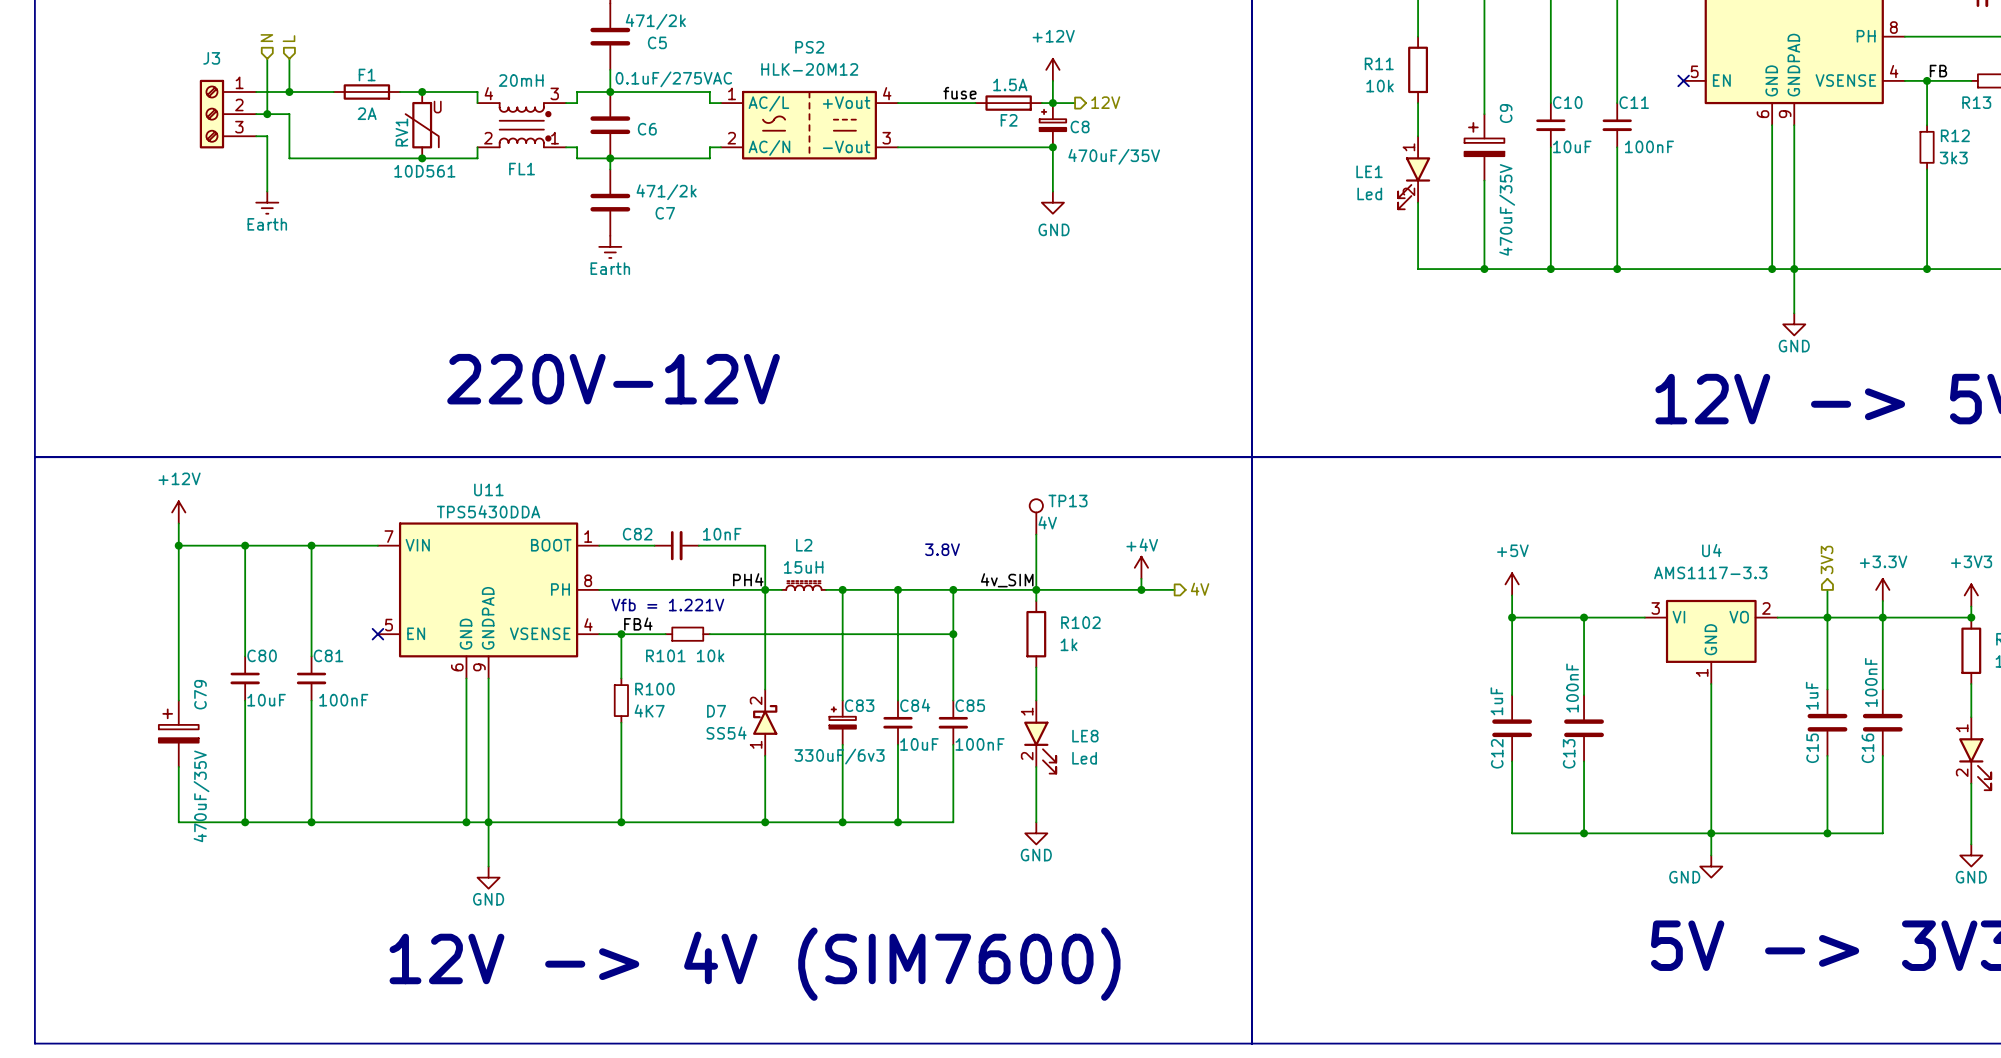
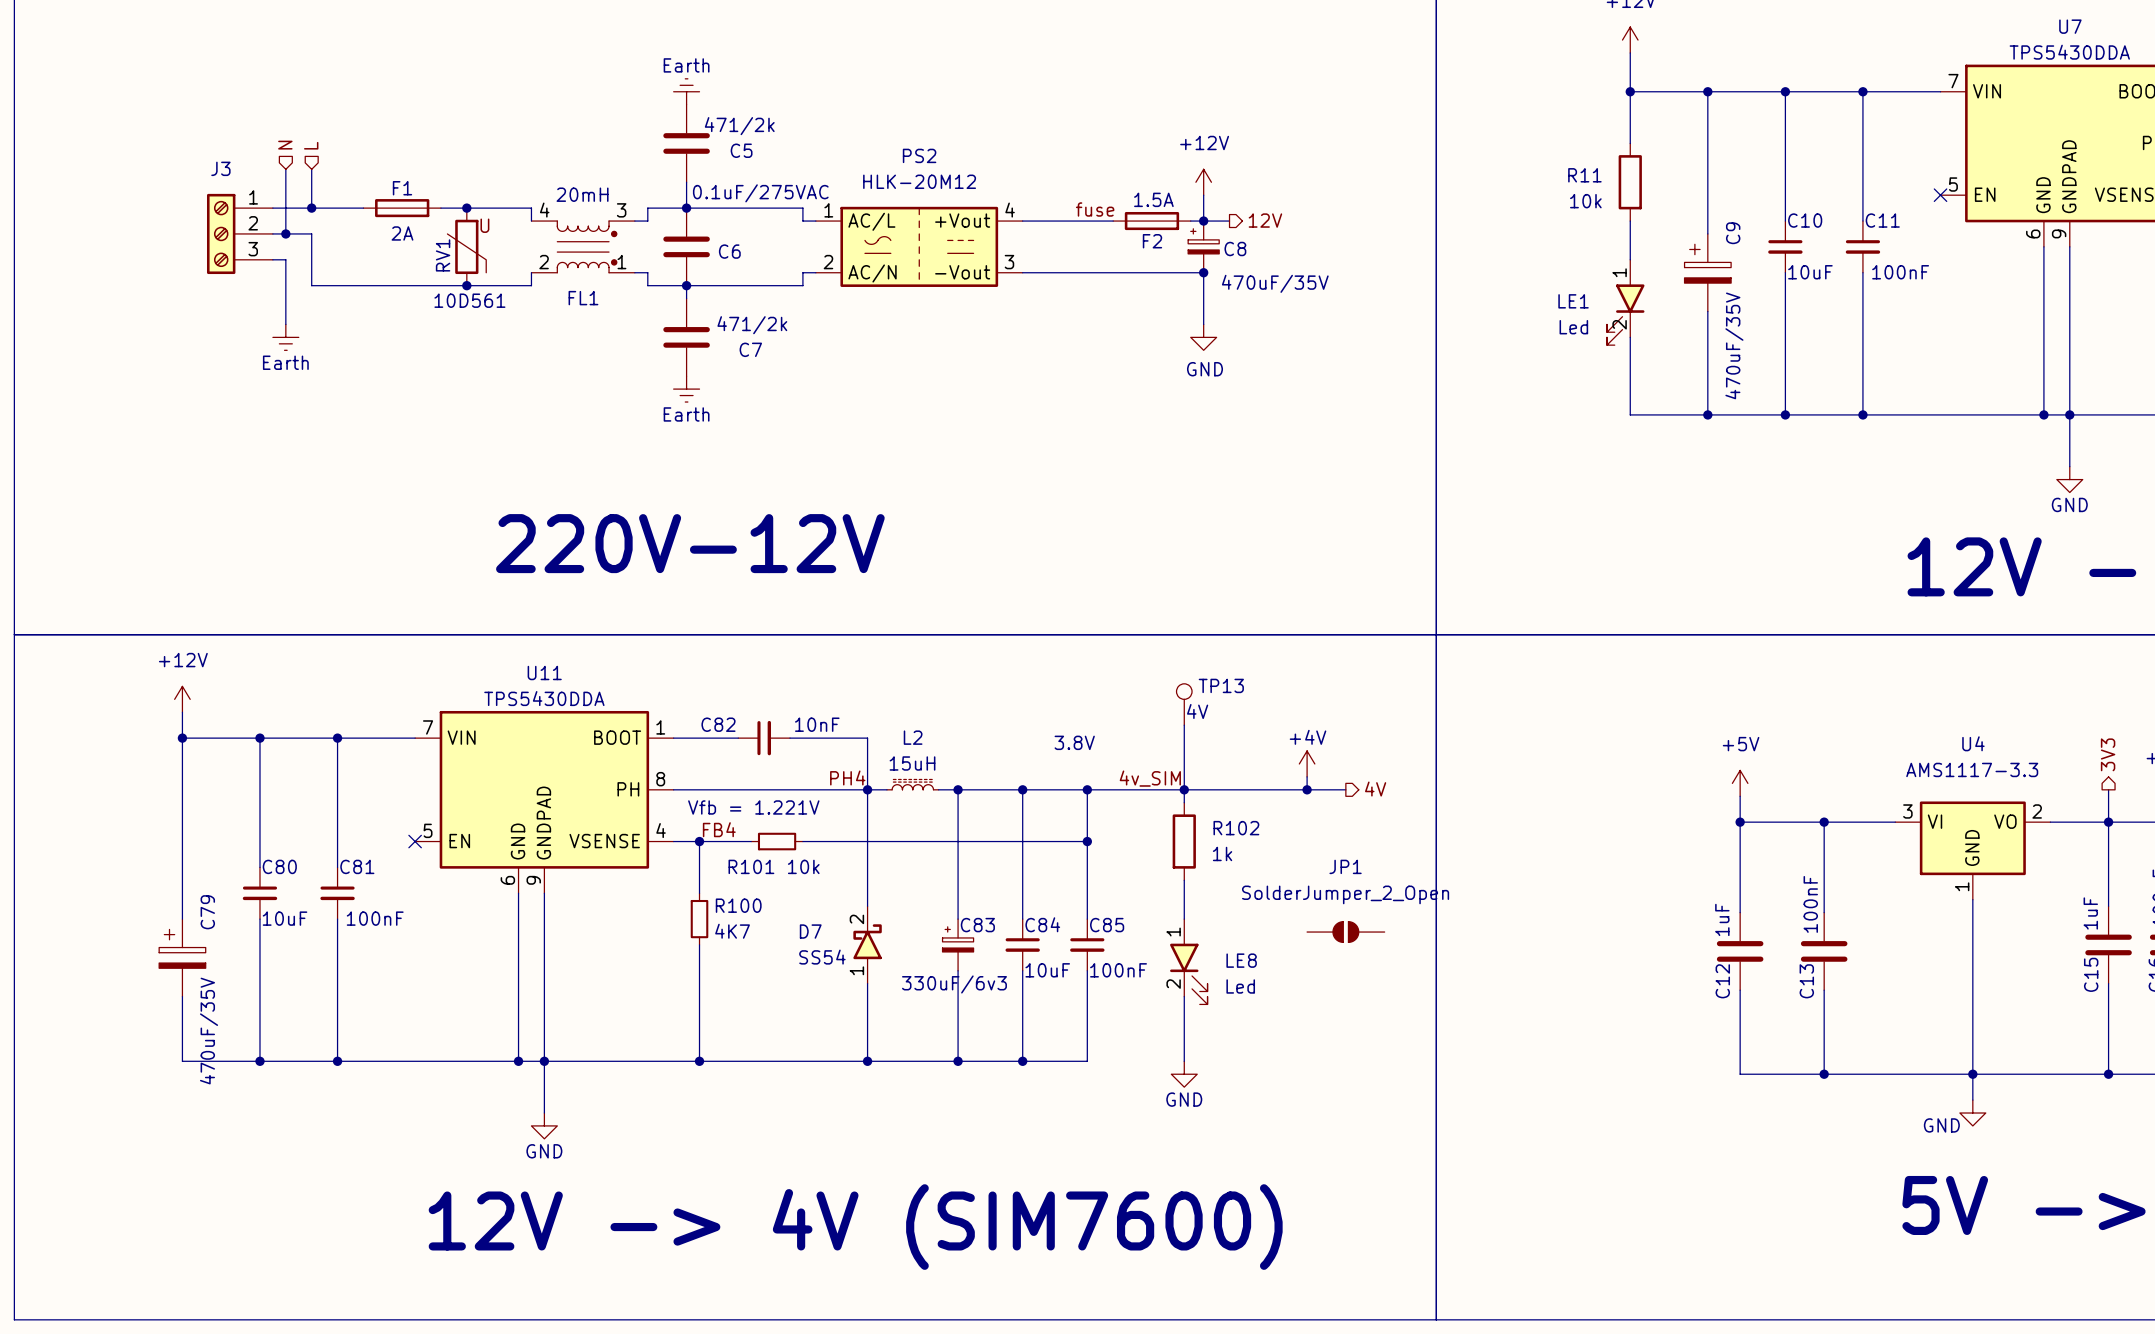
JP1: none -> SolderJumper_2_Open (1345, 932)

